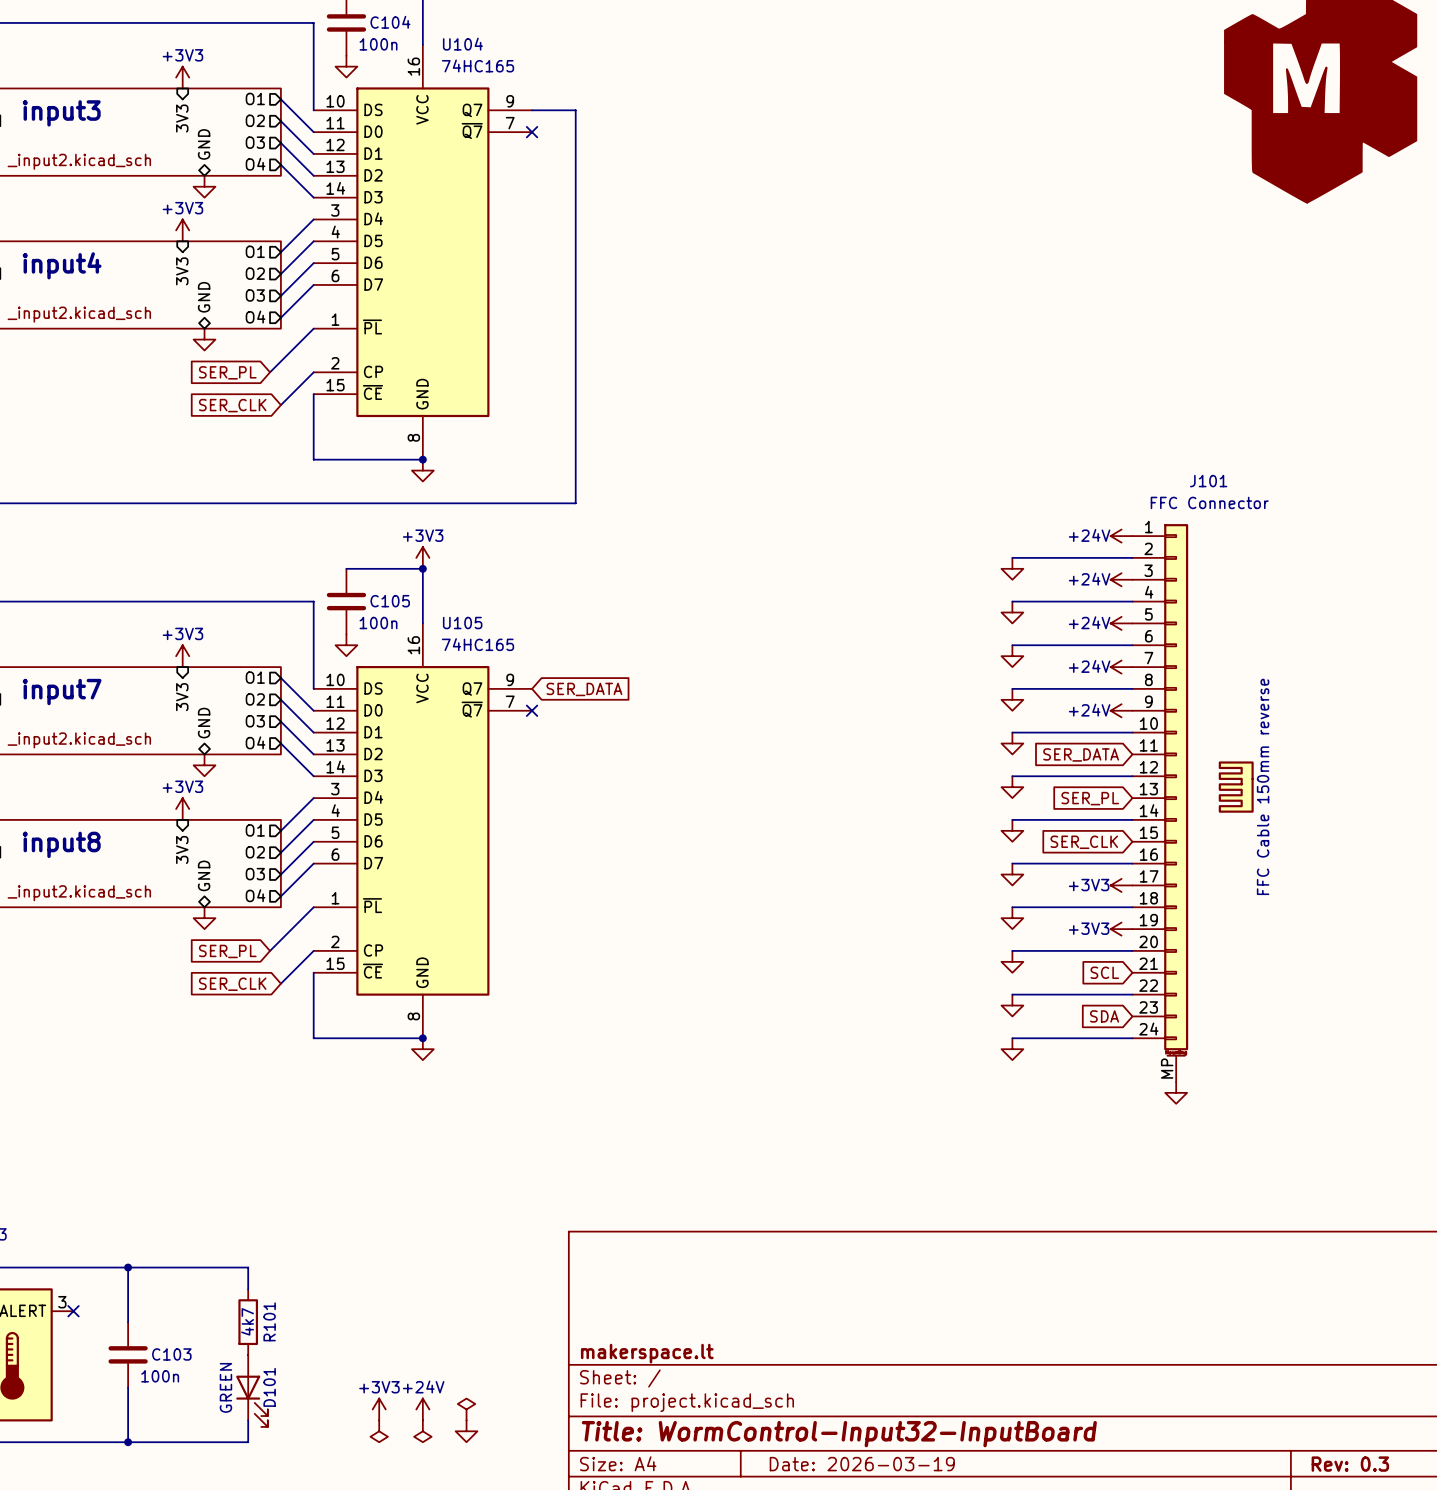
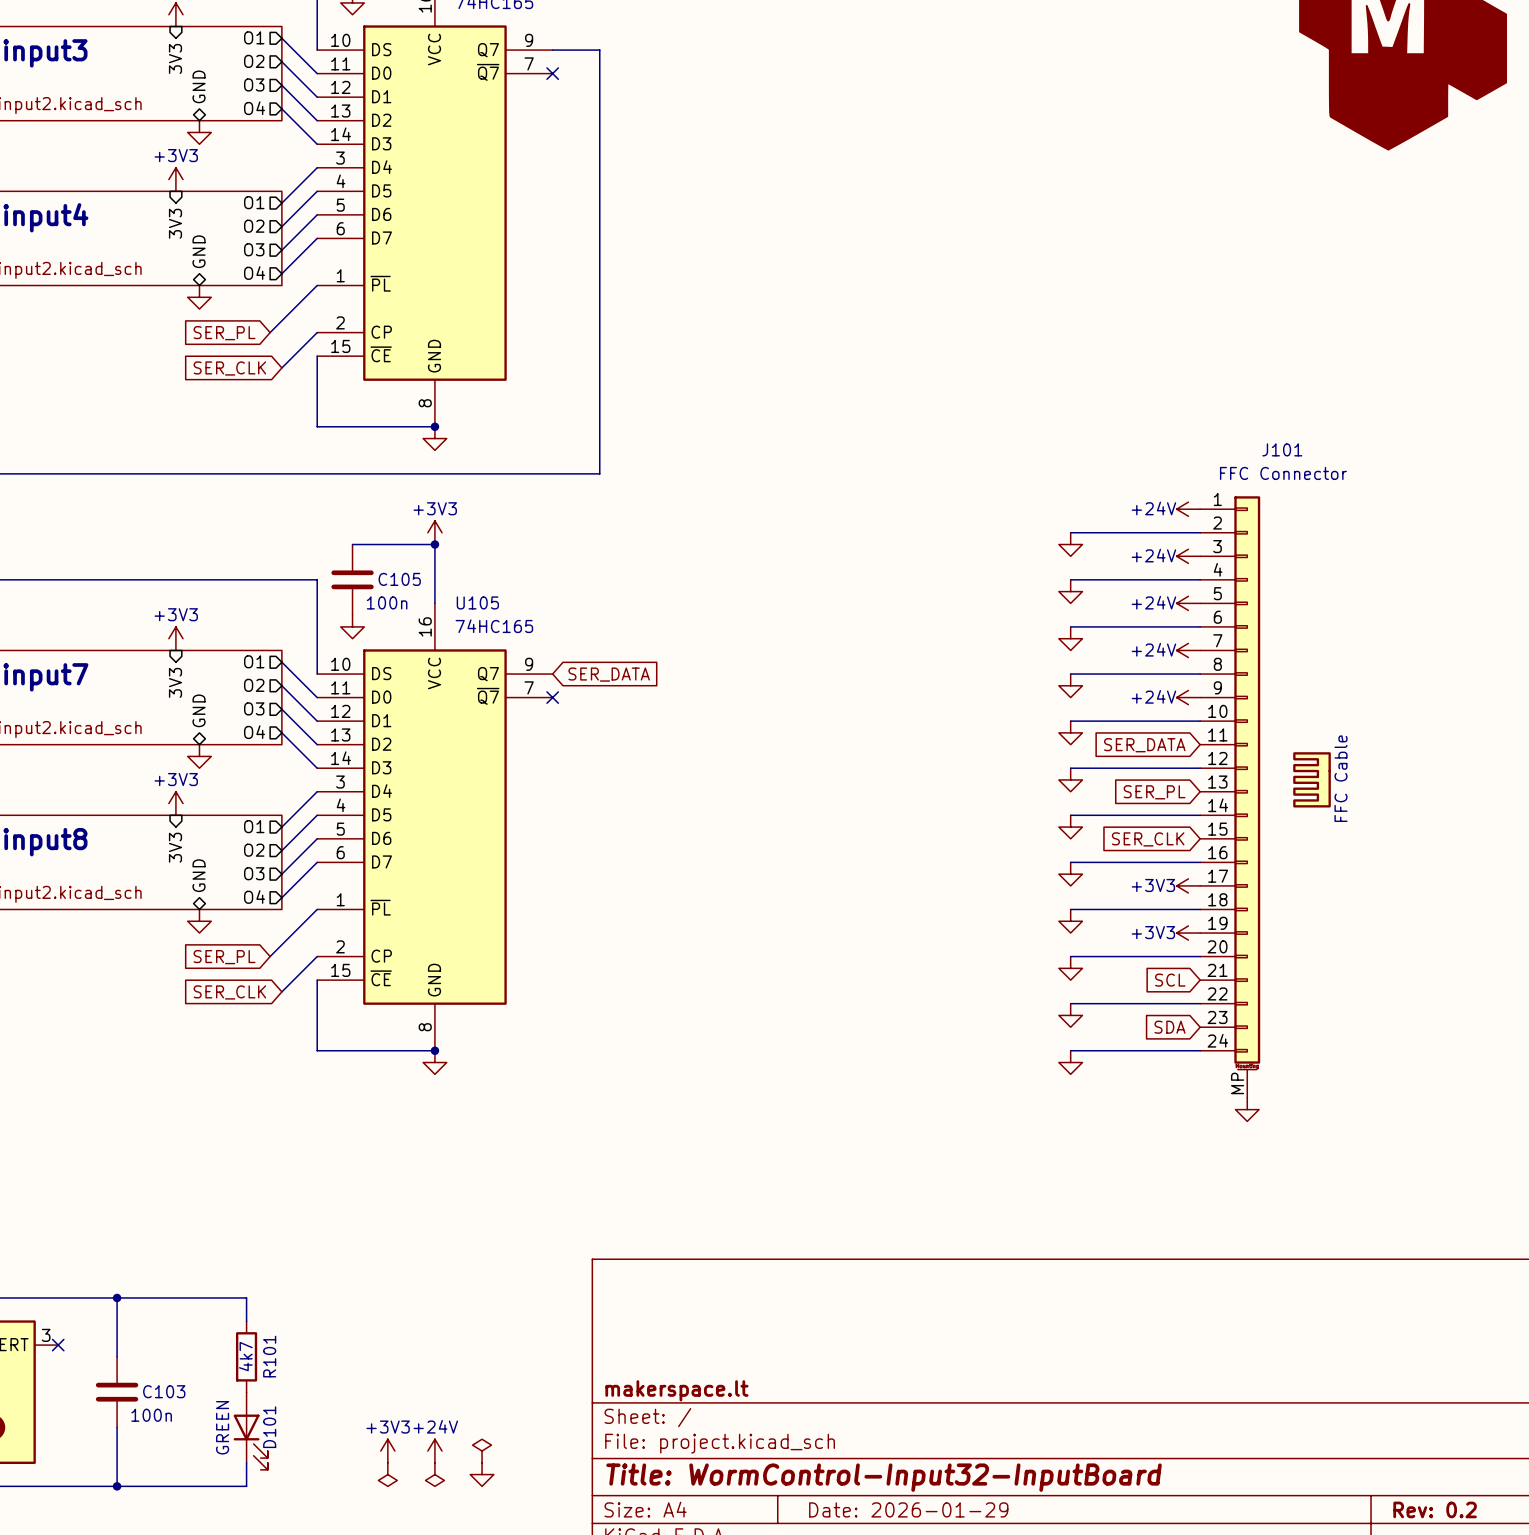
part value: FFC Cable 150mm reverse (1263, 786) -> FFC Cable (1341, 778)
title block: Date: 2026-03-19 (862, 1464) -> Date: 2026-01-29 (908, 1509)
title block: Rev: 0.3 (1350, 1464) -> Rev: 0.2 (1435, 1509)

